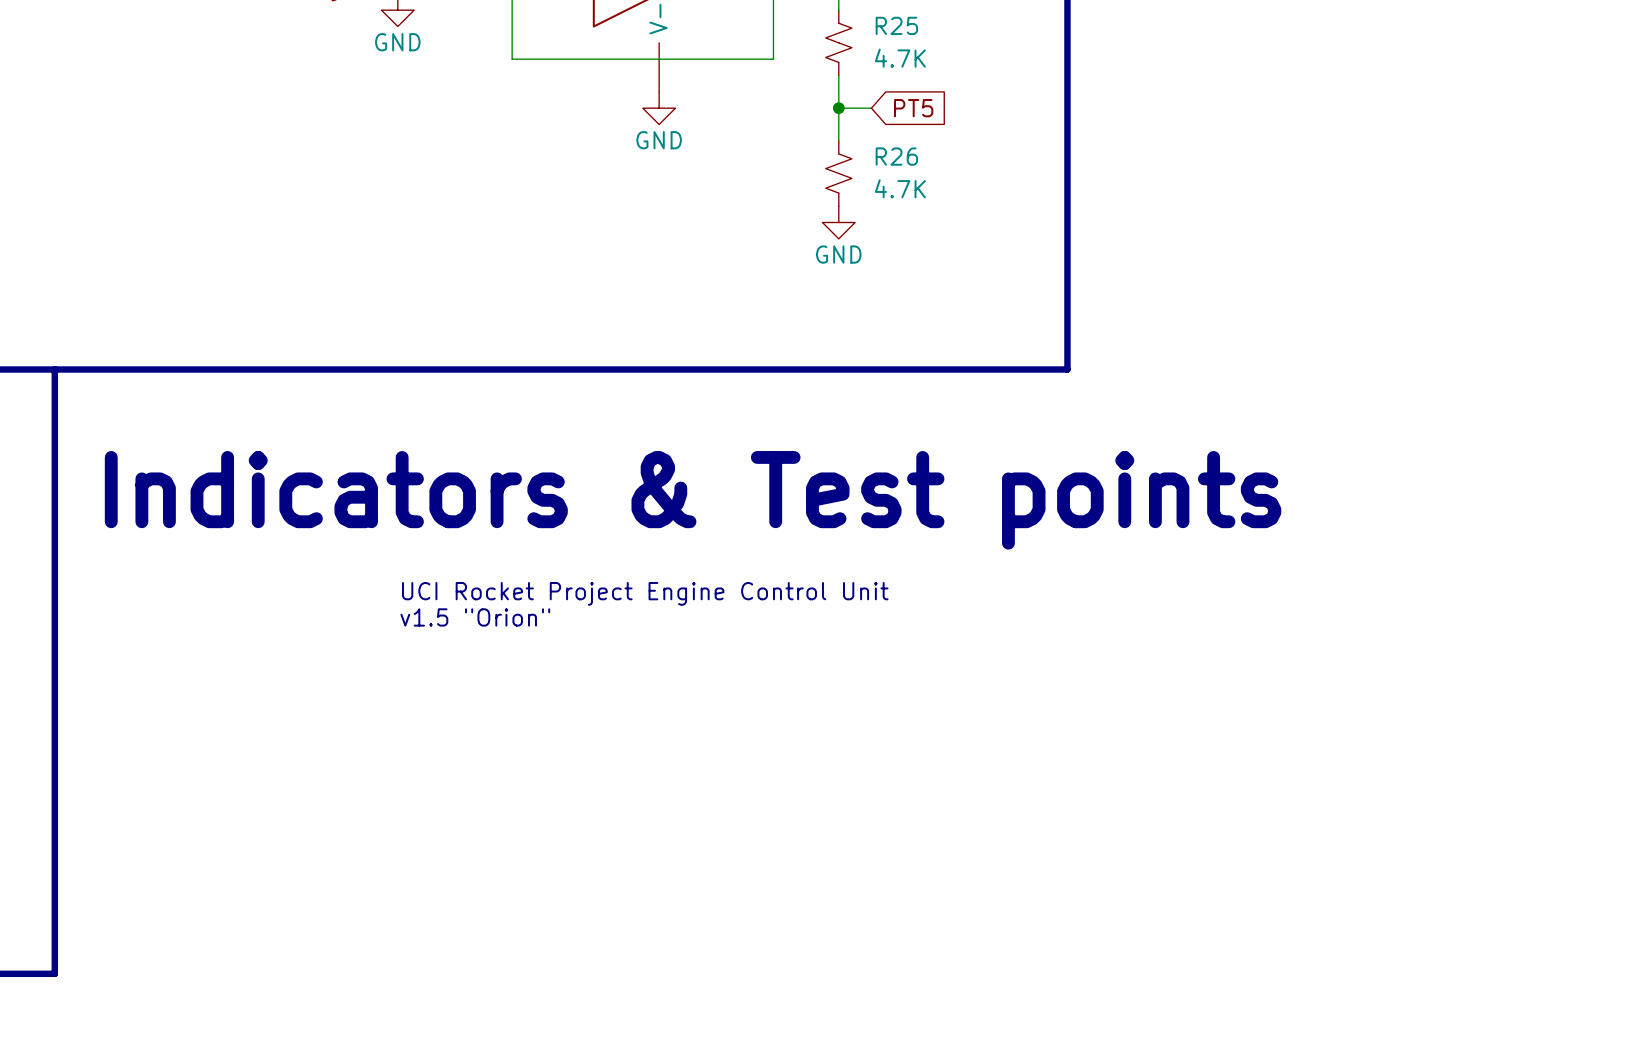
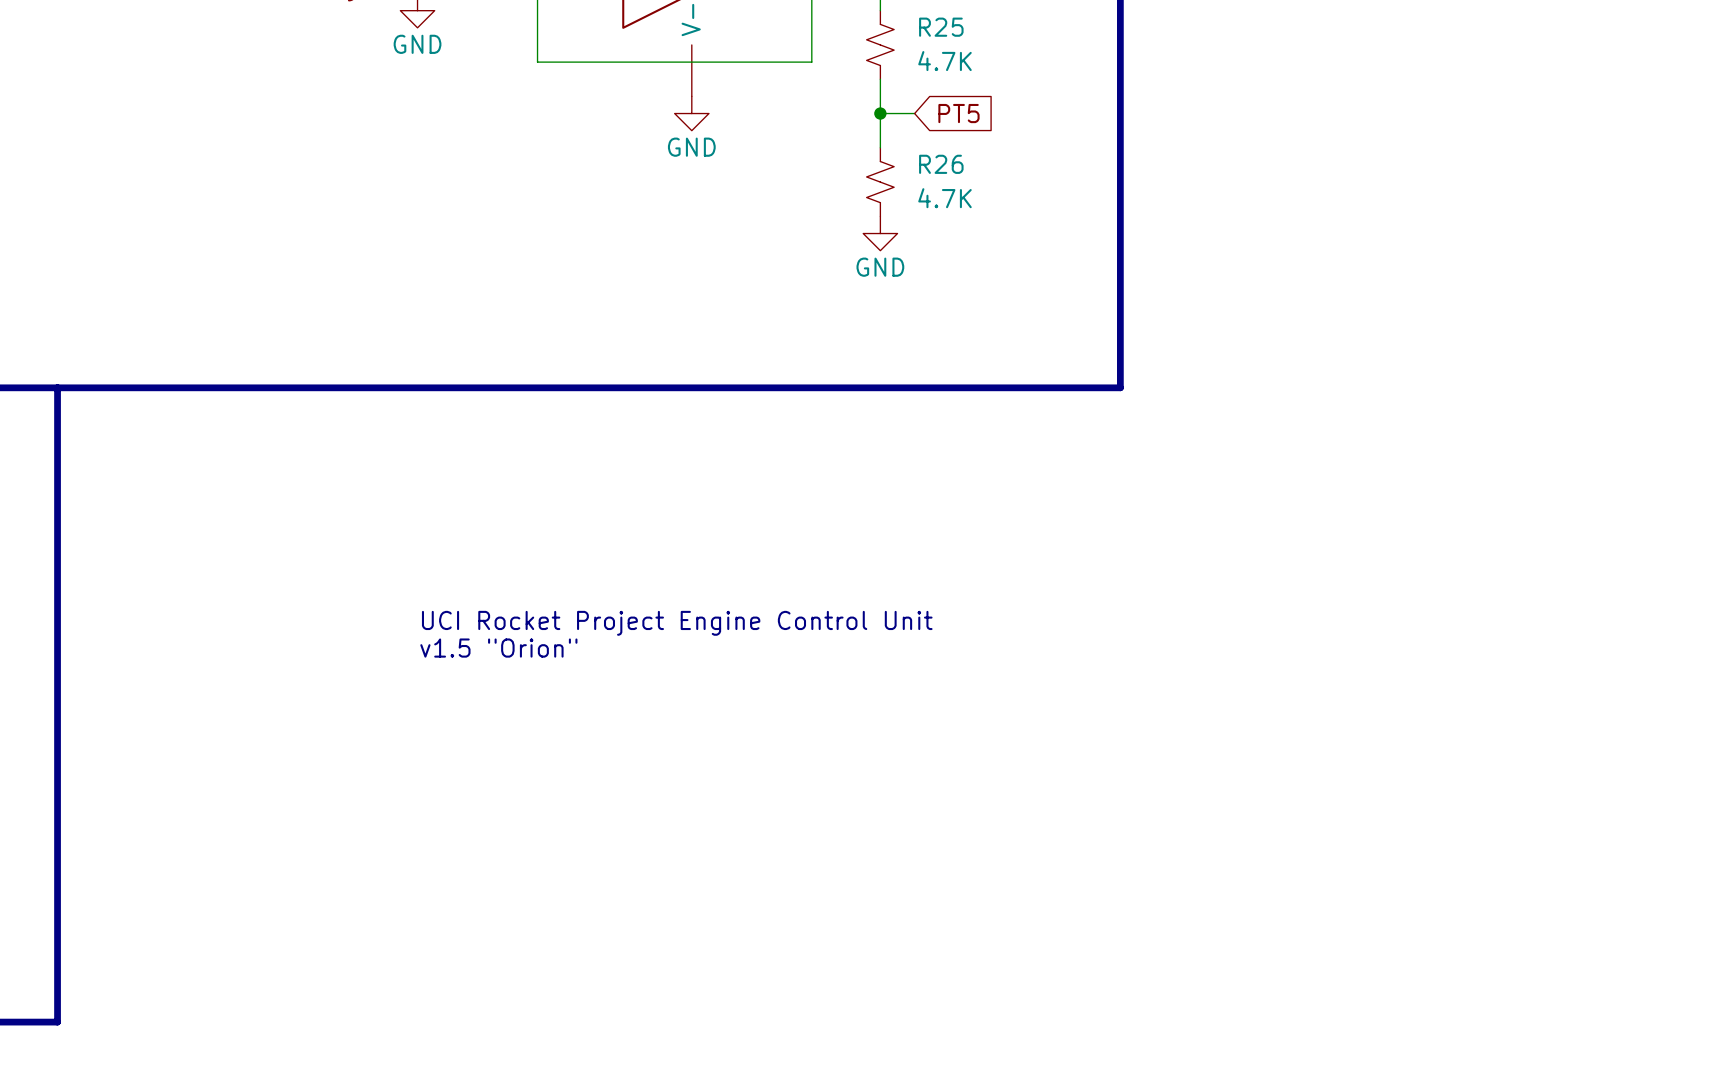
text: Indicators & Test points (693, 500) -> none

